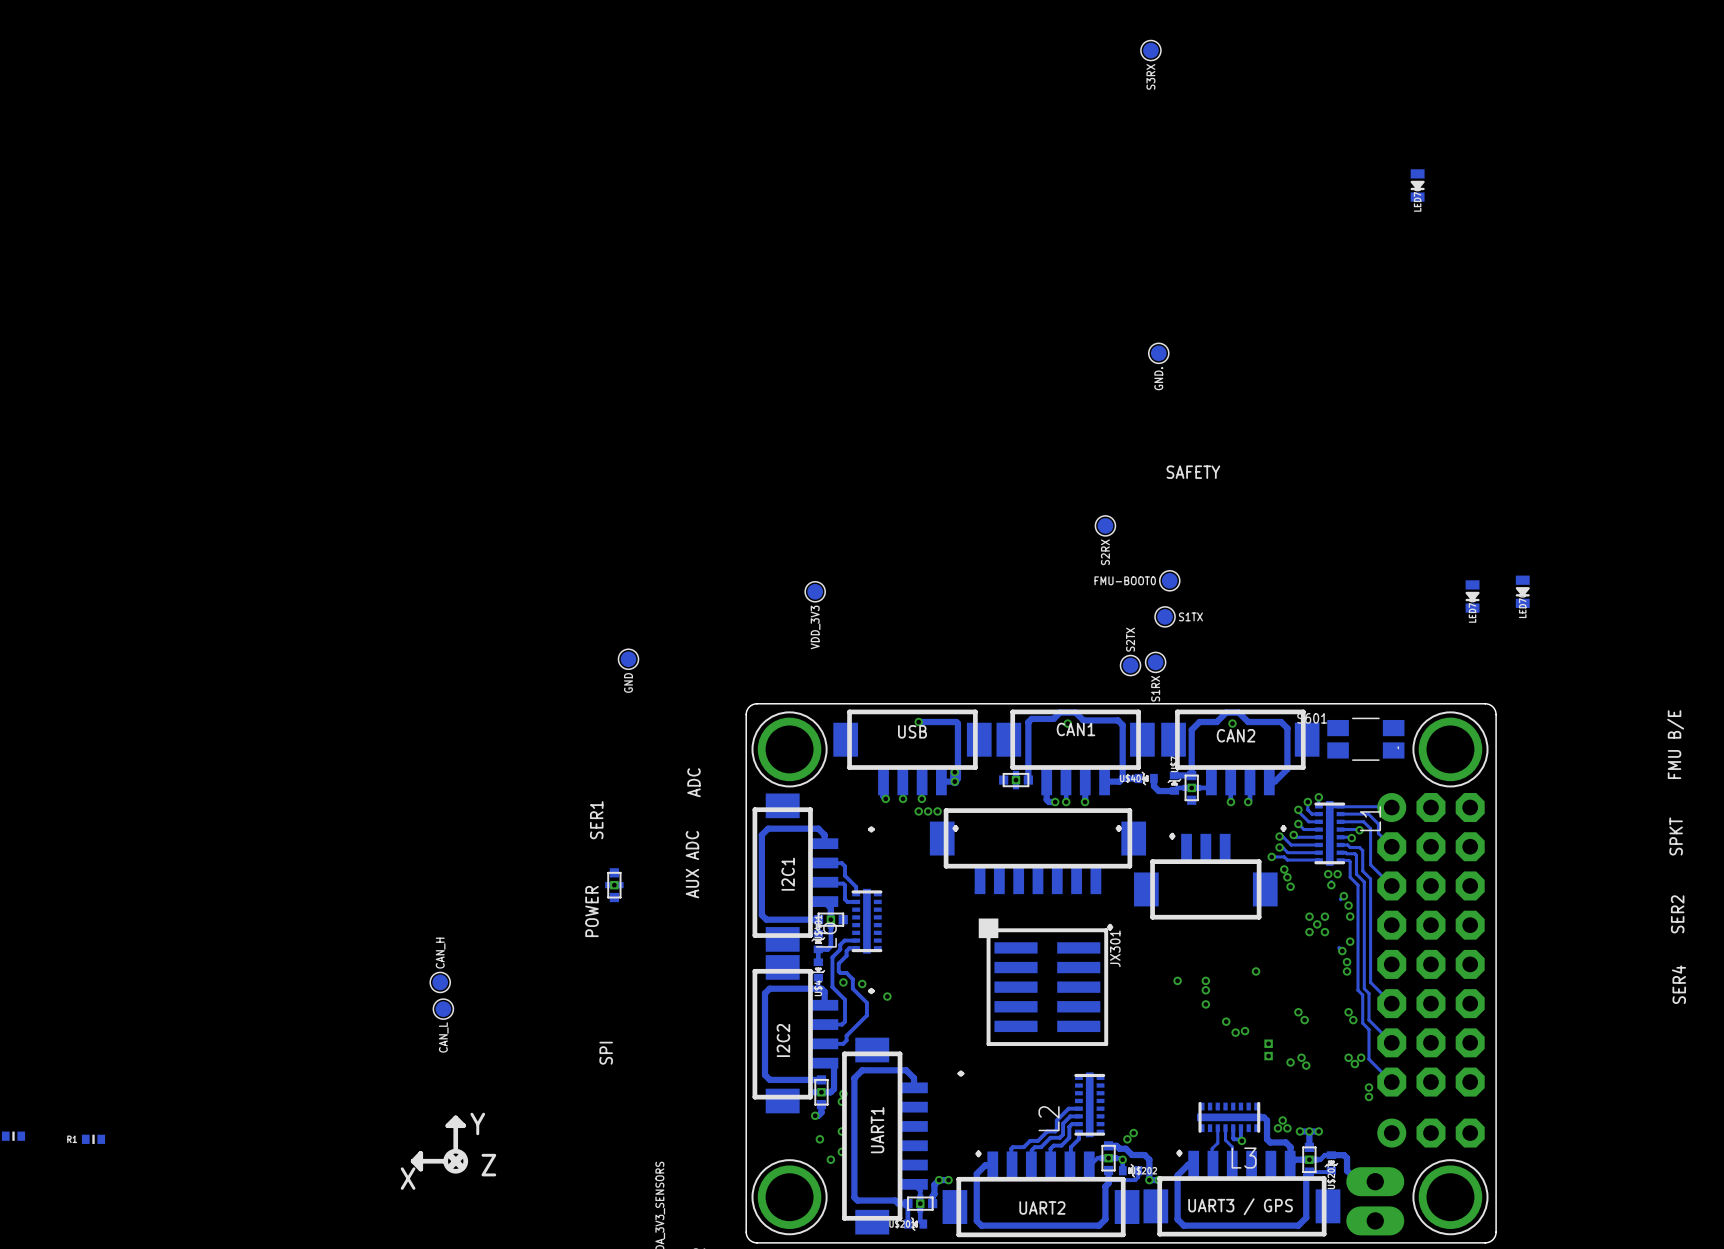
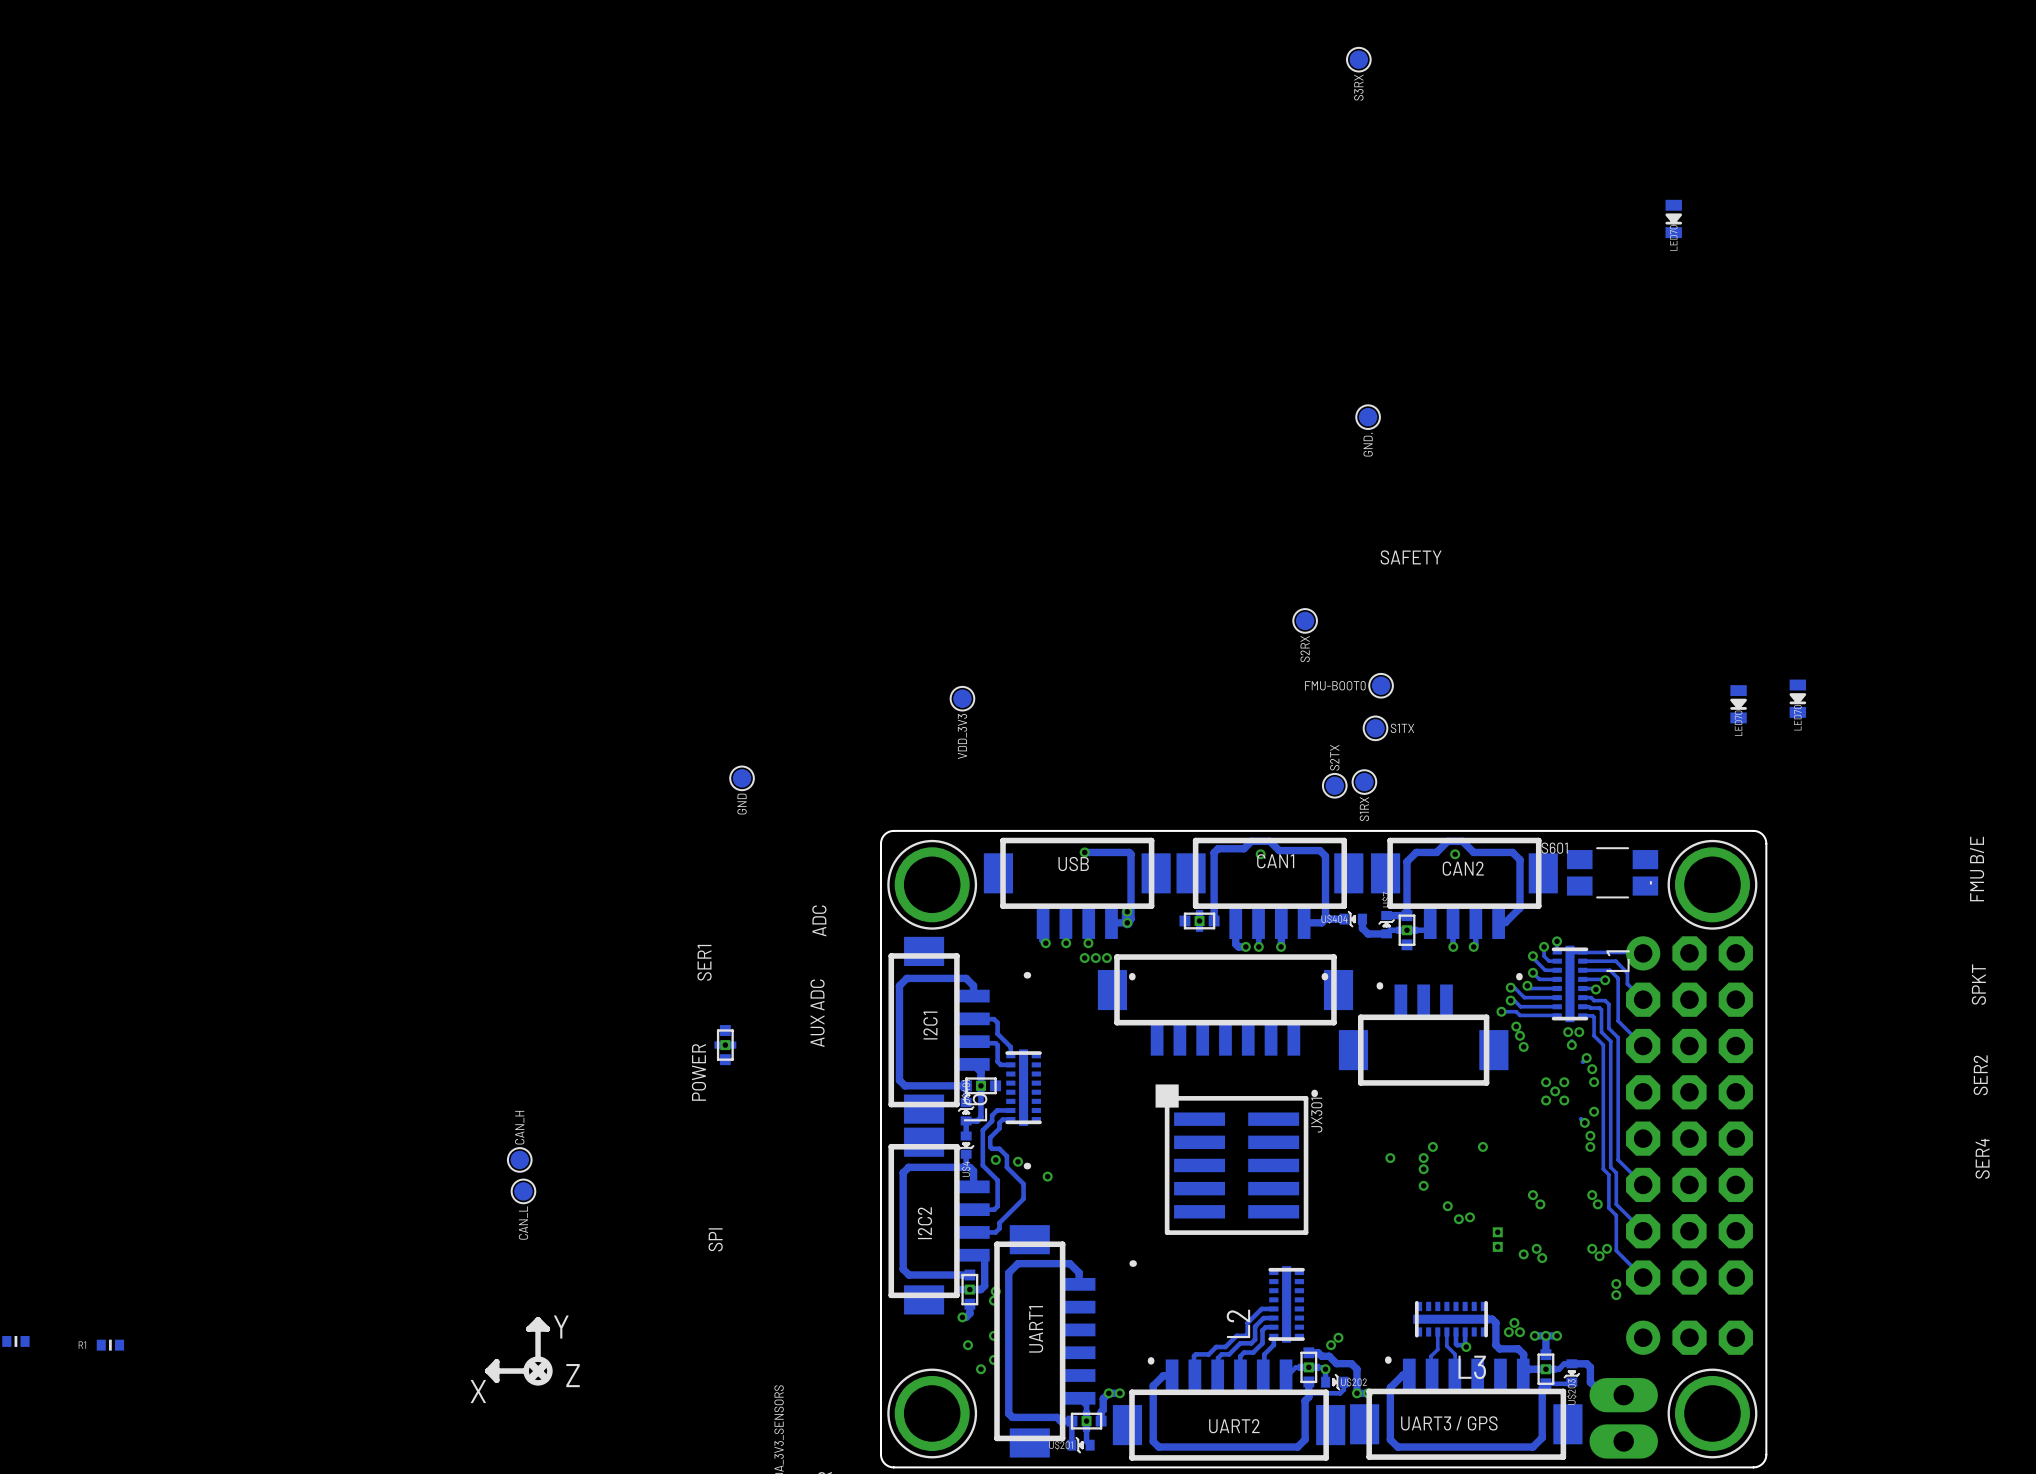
via: none -> (1432, 1146)

